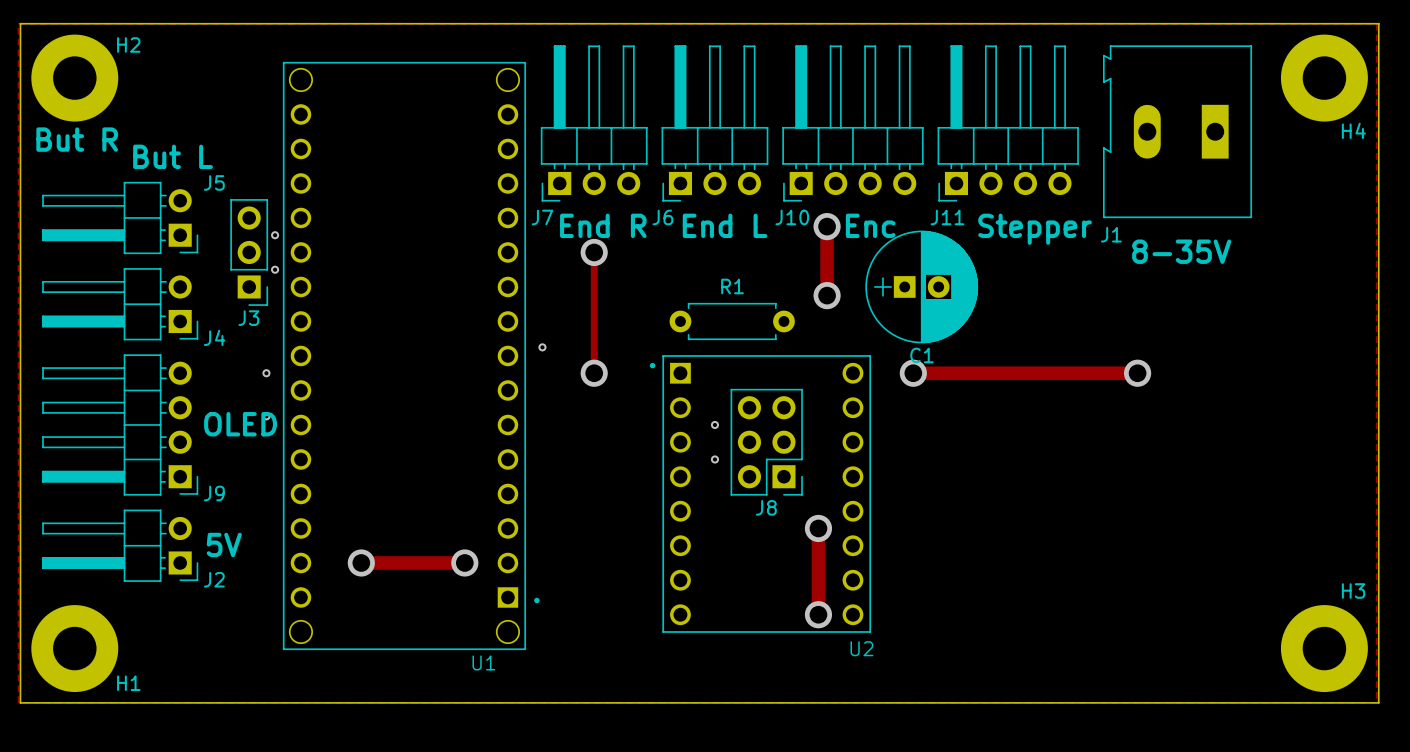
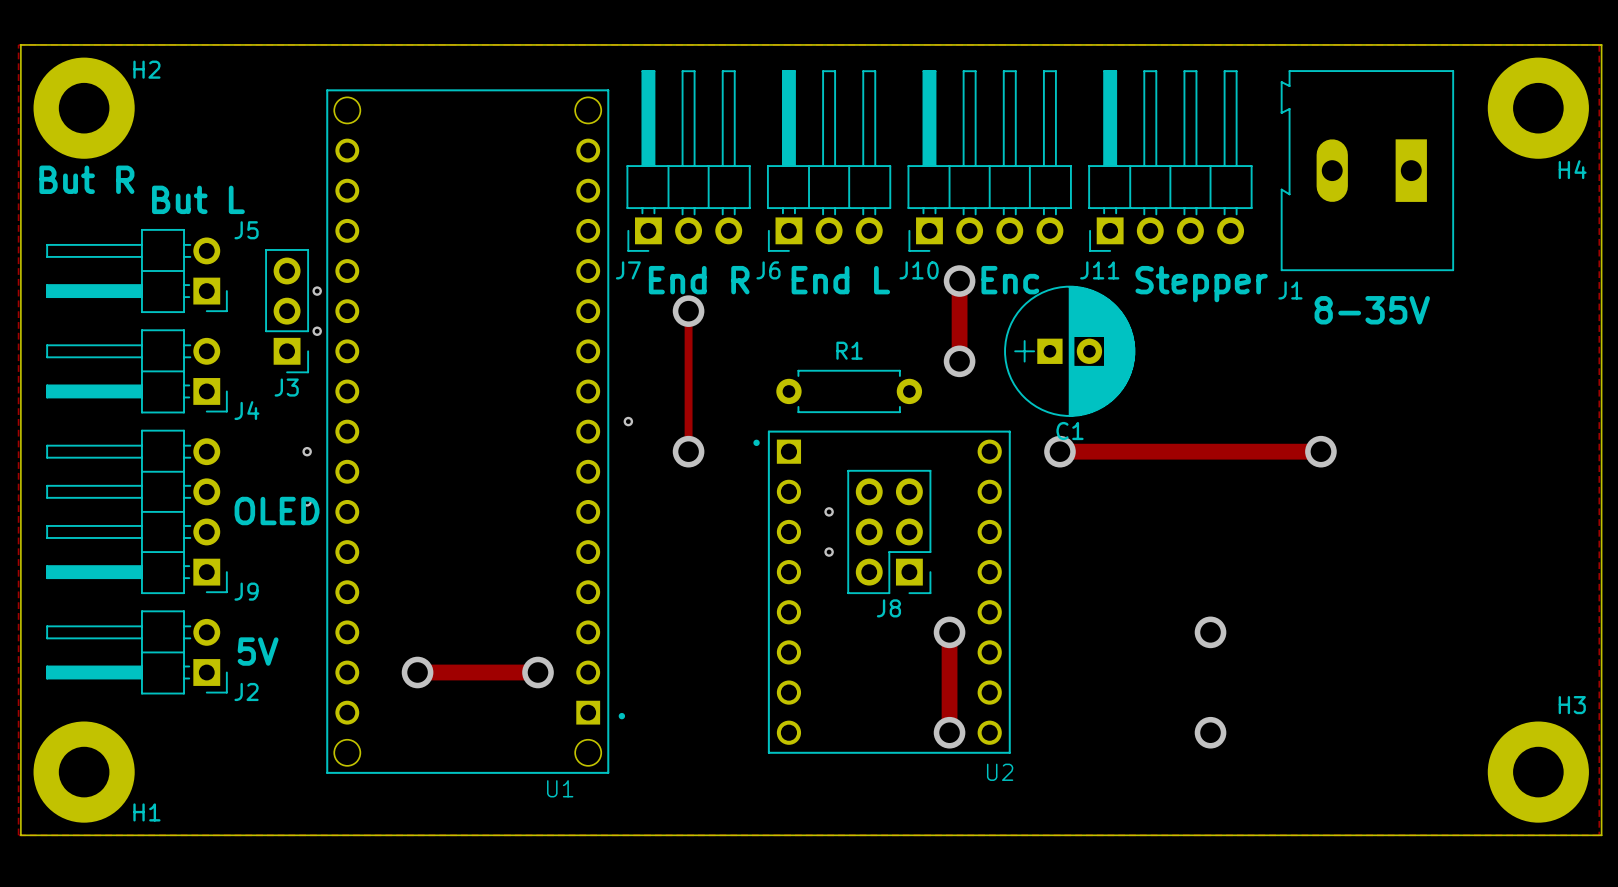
via: none -> (1210, 632)
via: none -> (1210, 732)

